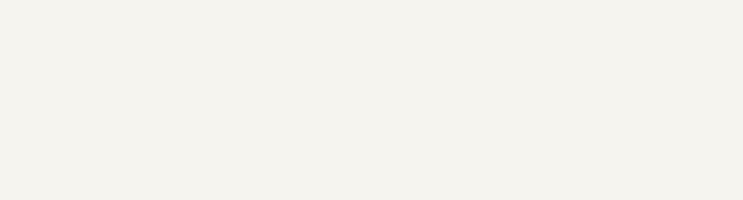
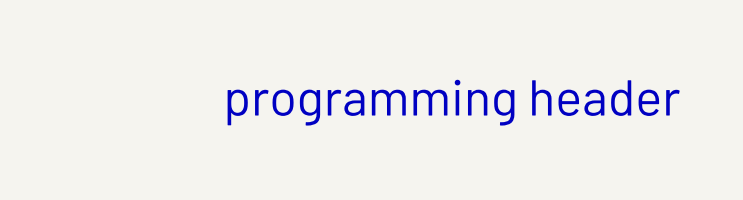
text: none -> programming header (453, 102)

